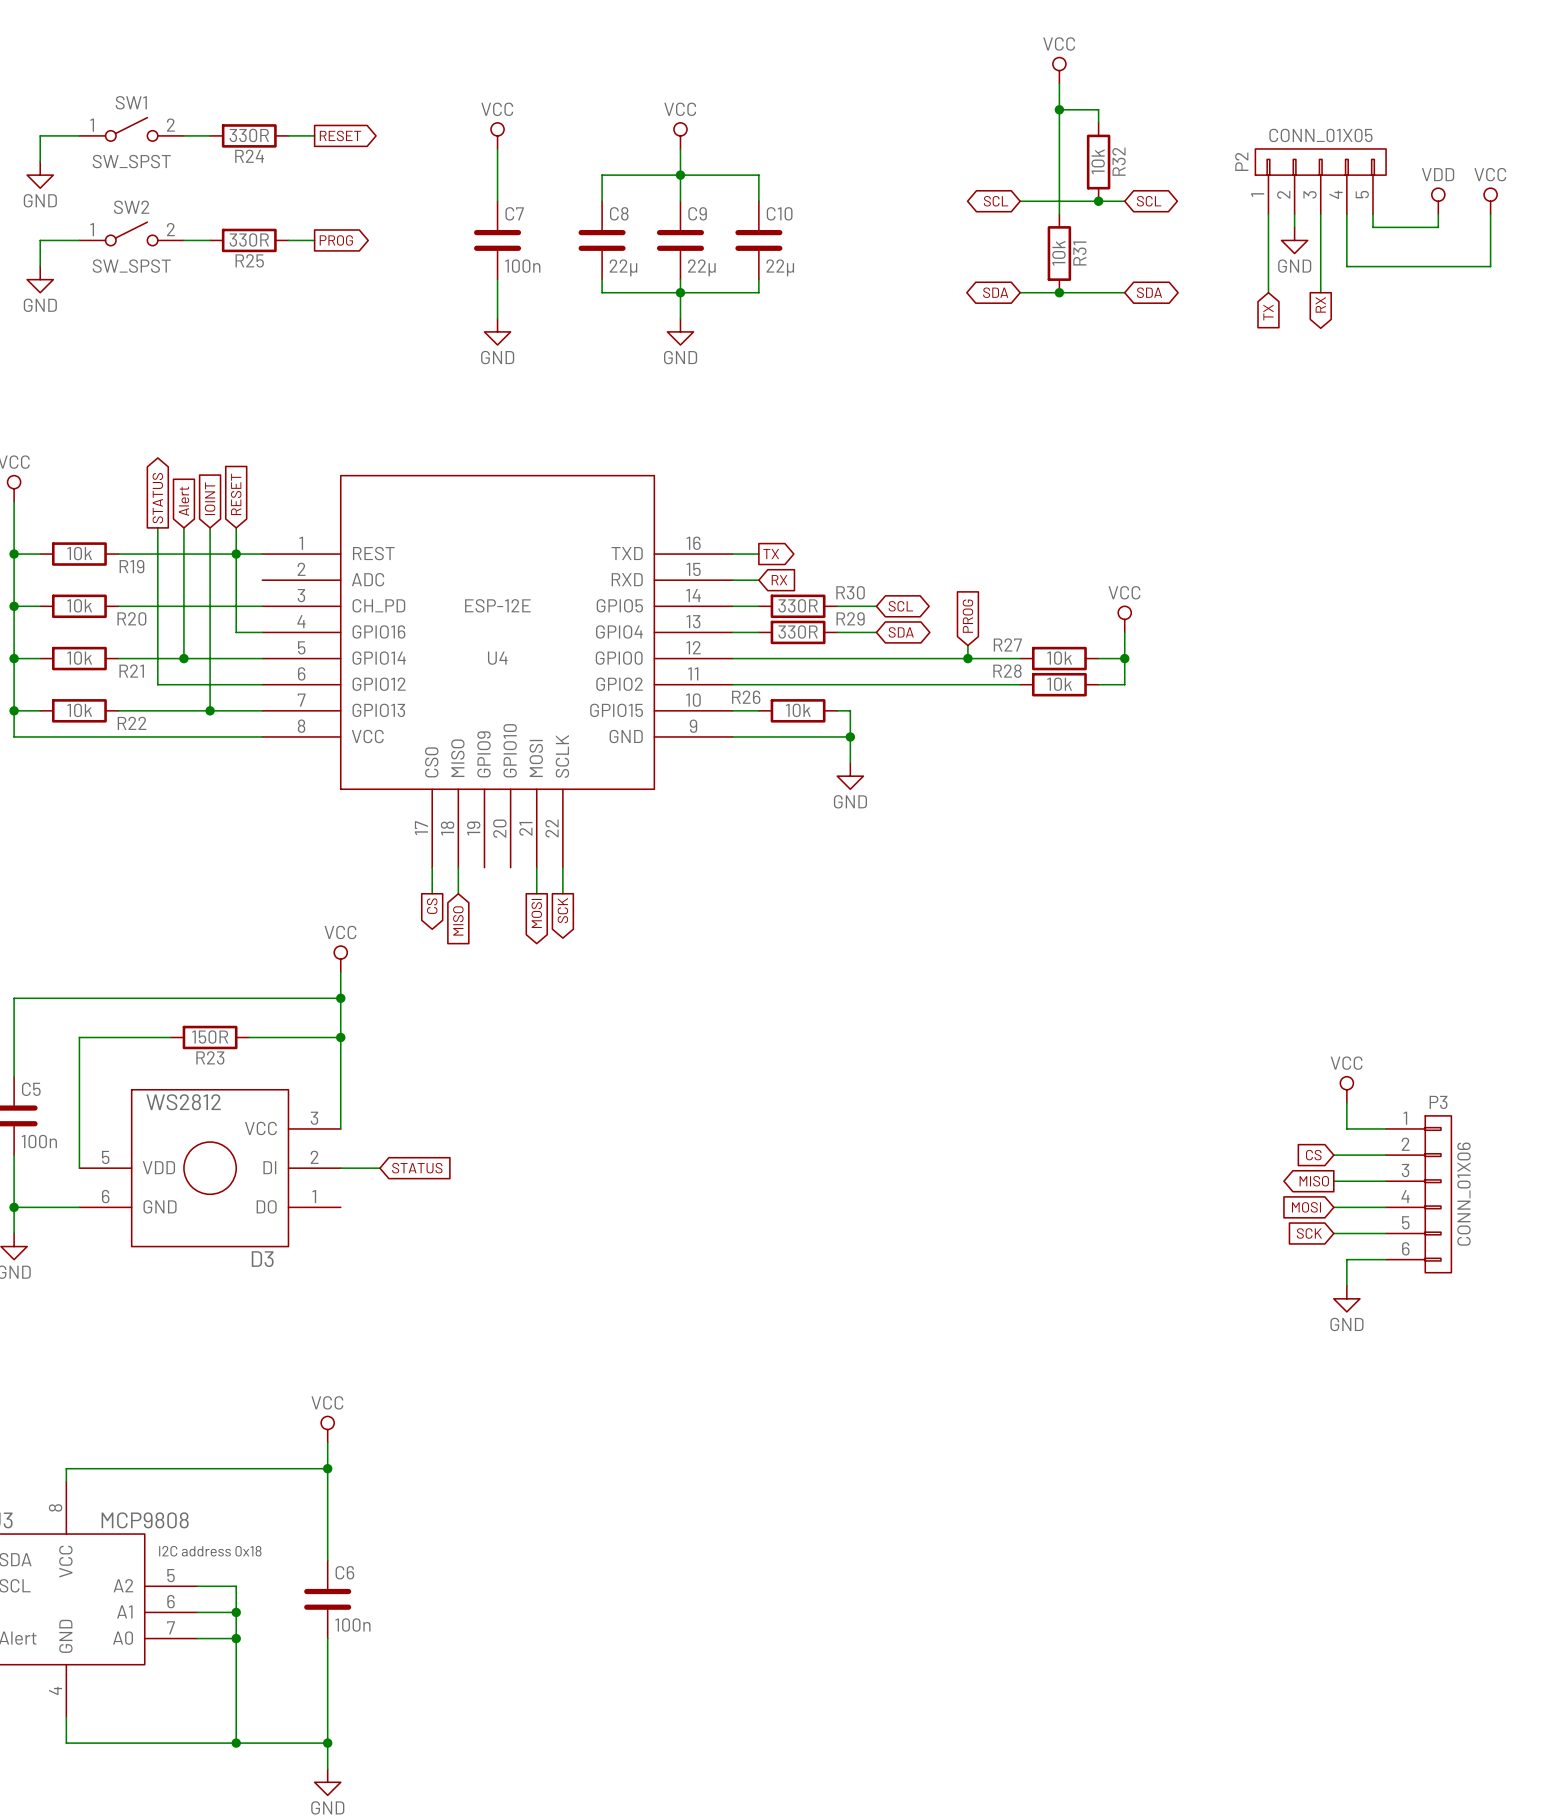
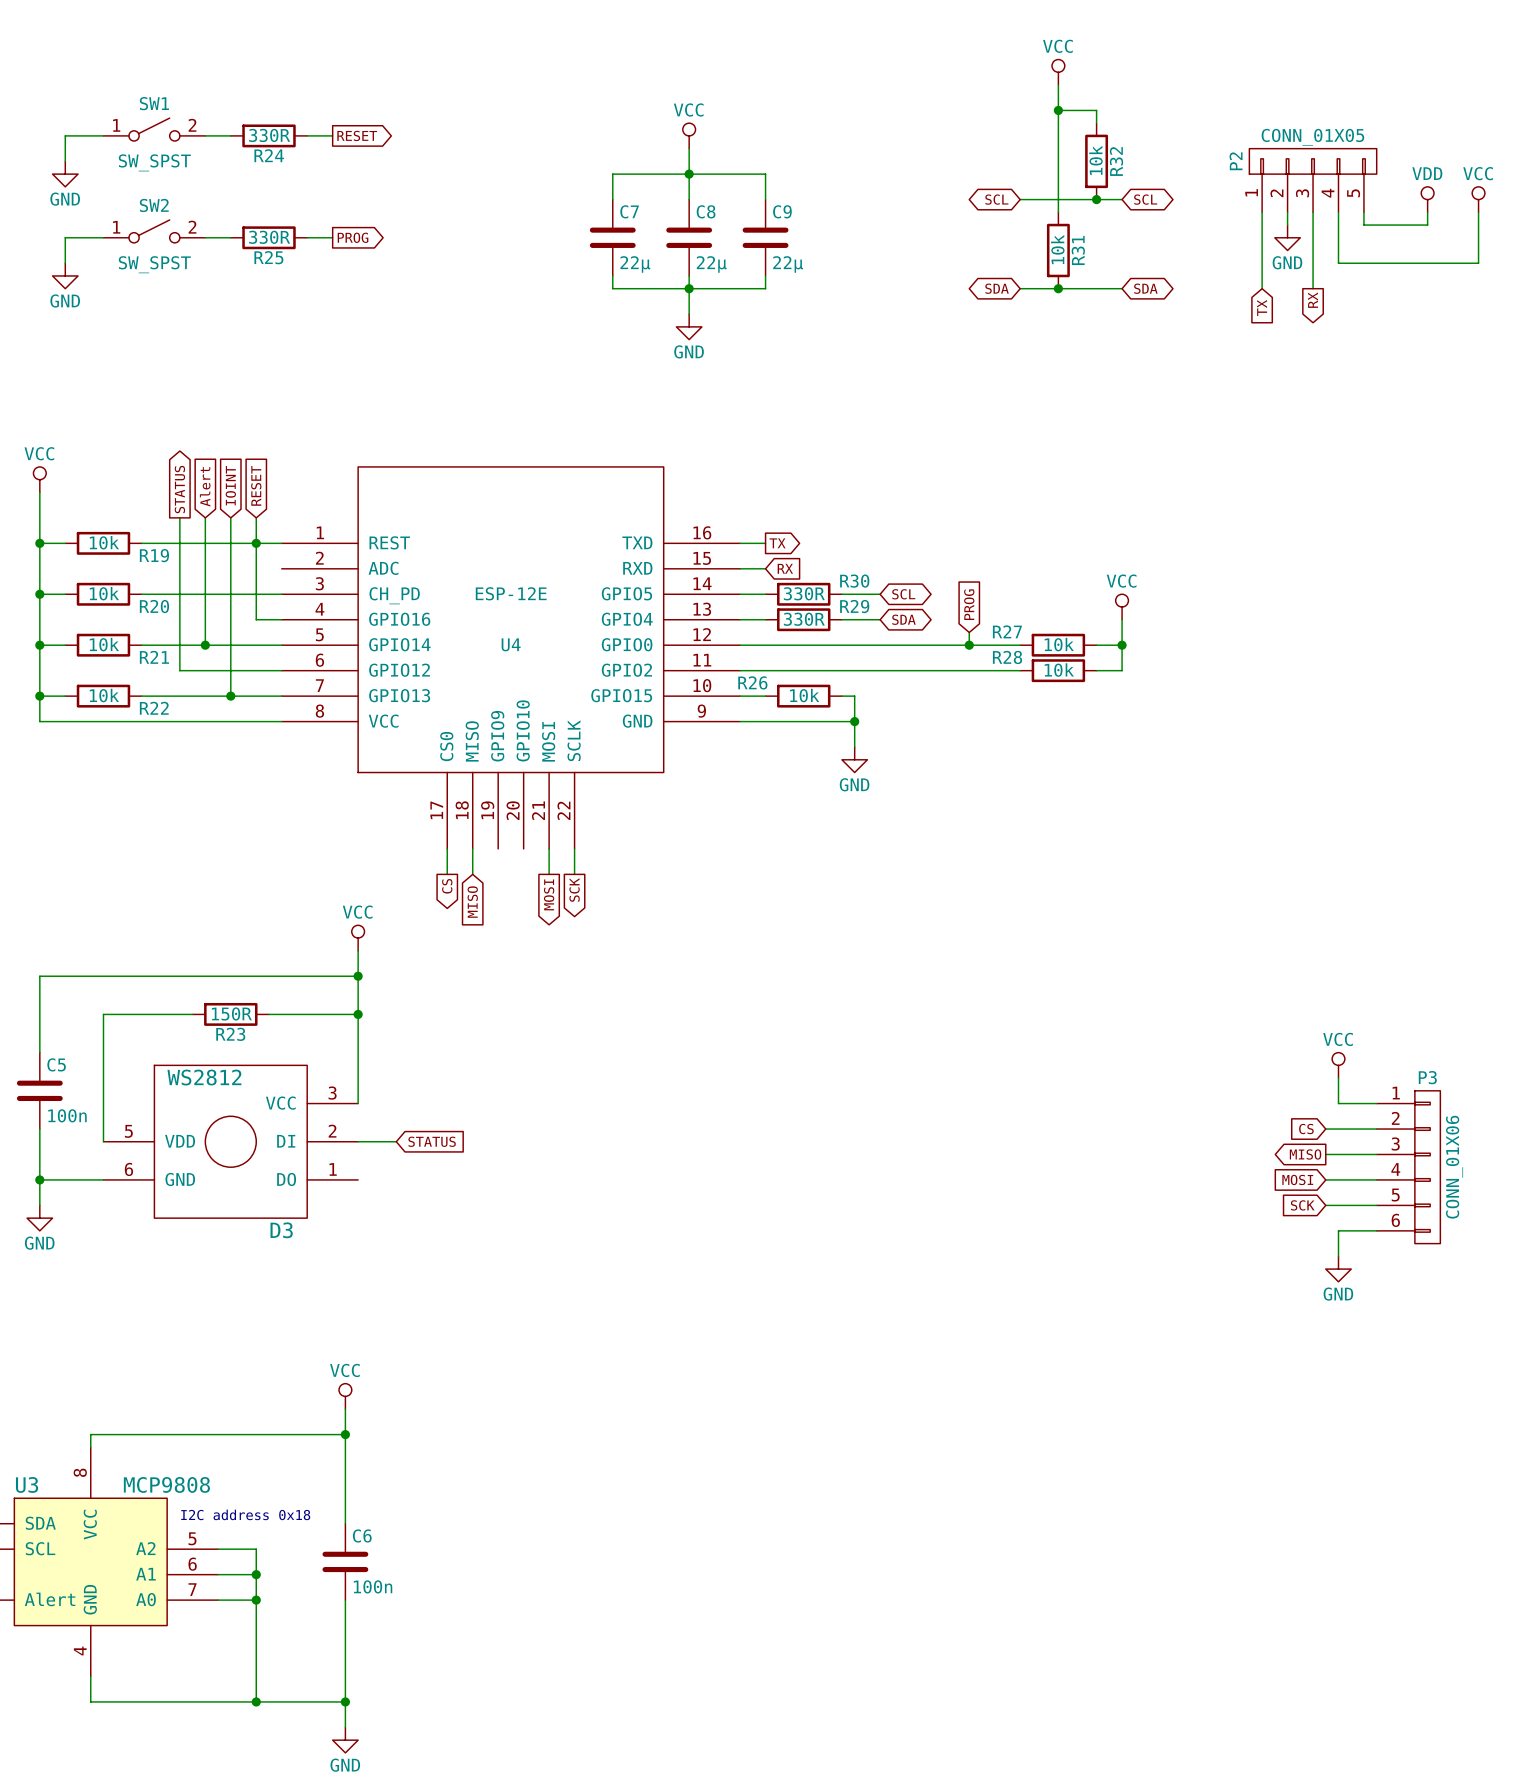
power symbol: VCC (497, 135) -> none
wire: (497, 148) (497, 201) -> none
C8 name: C8 (619, 213) -> C7 (629, 211)
C9 name: C9 (697, 213) -> C8 (706, 211)
C10 name: C10 (779, 213) -> C9 (782, 211)
C7: 100n (497, 240) -> none
wire: (497, 279) (497, 318) -> none
power symbol: GND (497, 331) -> none

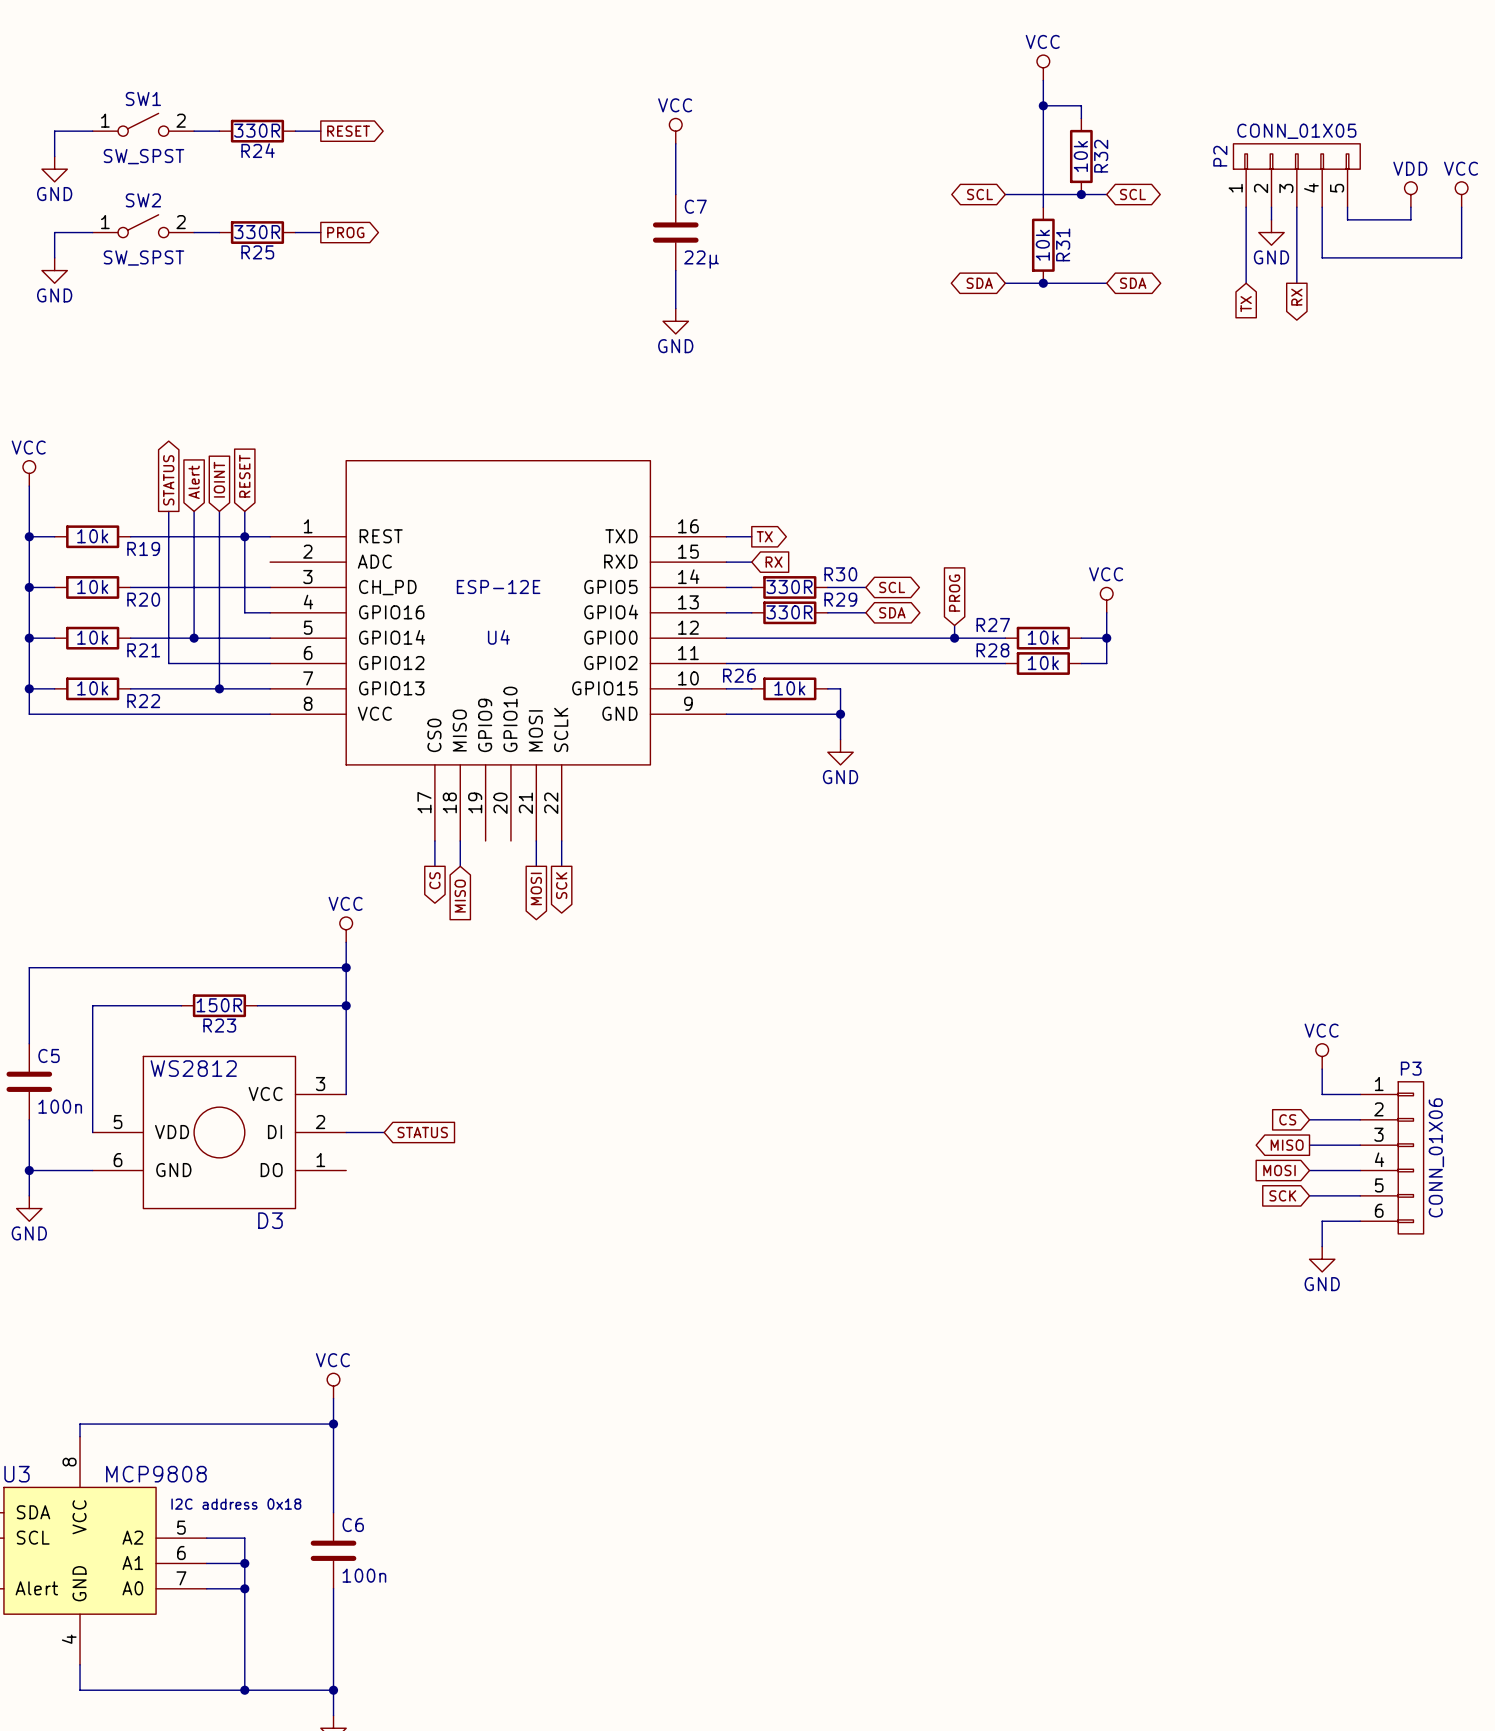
junction: (689, 174) -> none
wire: (612, 199) (612, 174) (765, 174) (765, 199) -> none
C8 name: C8 (706, 211) -> C7 (695, 206)
C7: 22µ (612, 237) -> none
C9: 22µ (765, 237) -> none
wire: (612, 275) (612, 288) (765, 288) (765, 275) -> none
junction: (689, 288) -> none

